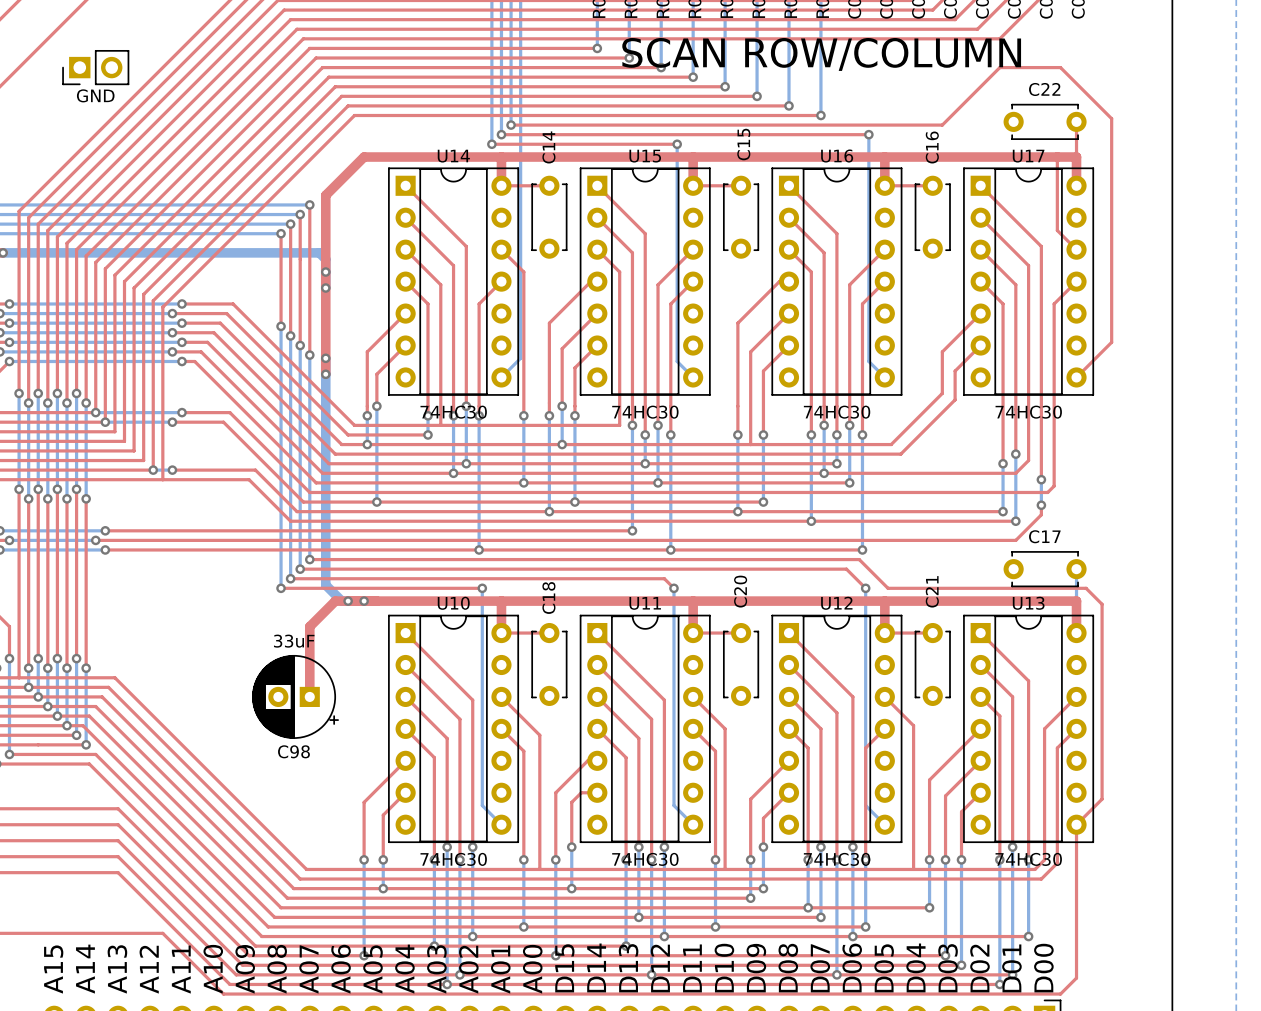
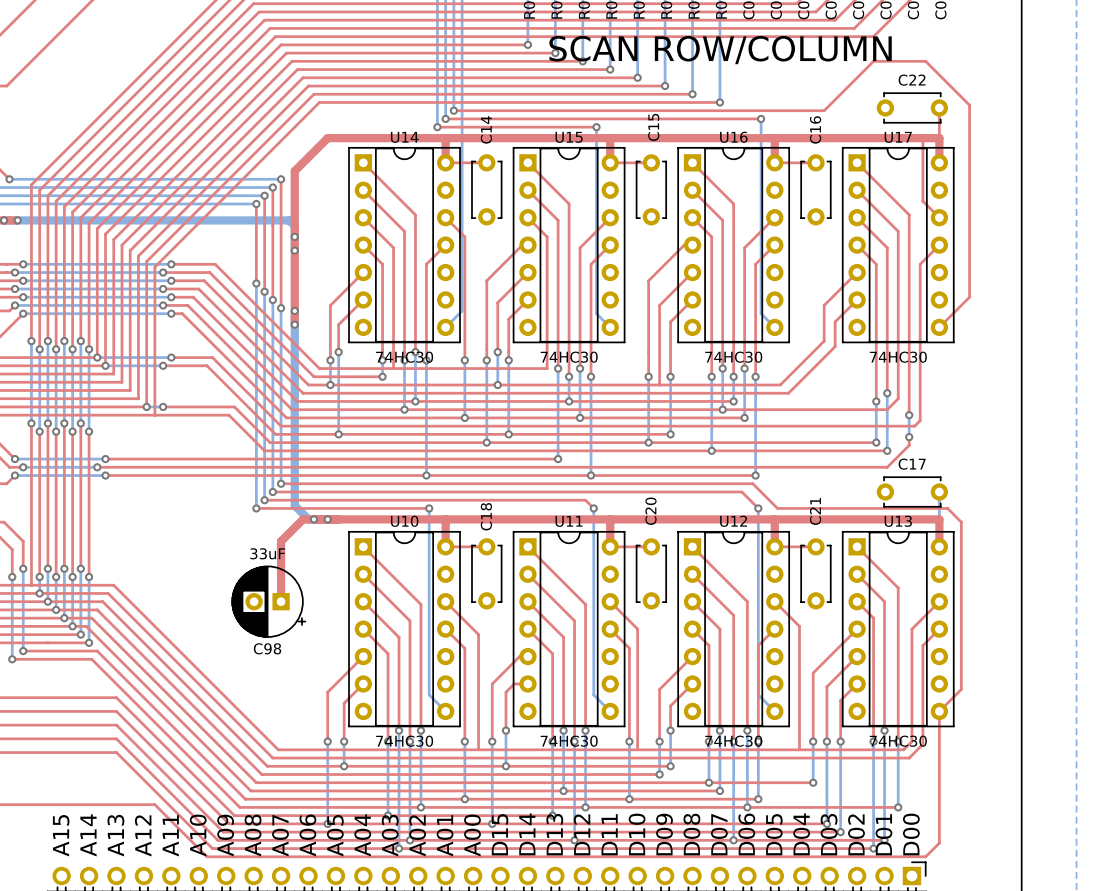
part: GND (95, 67) -> none

